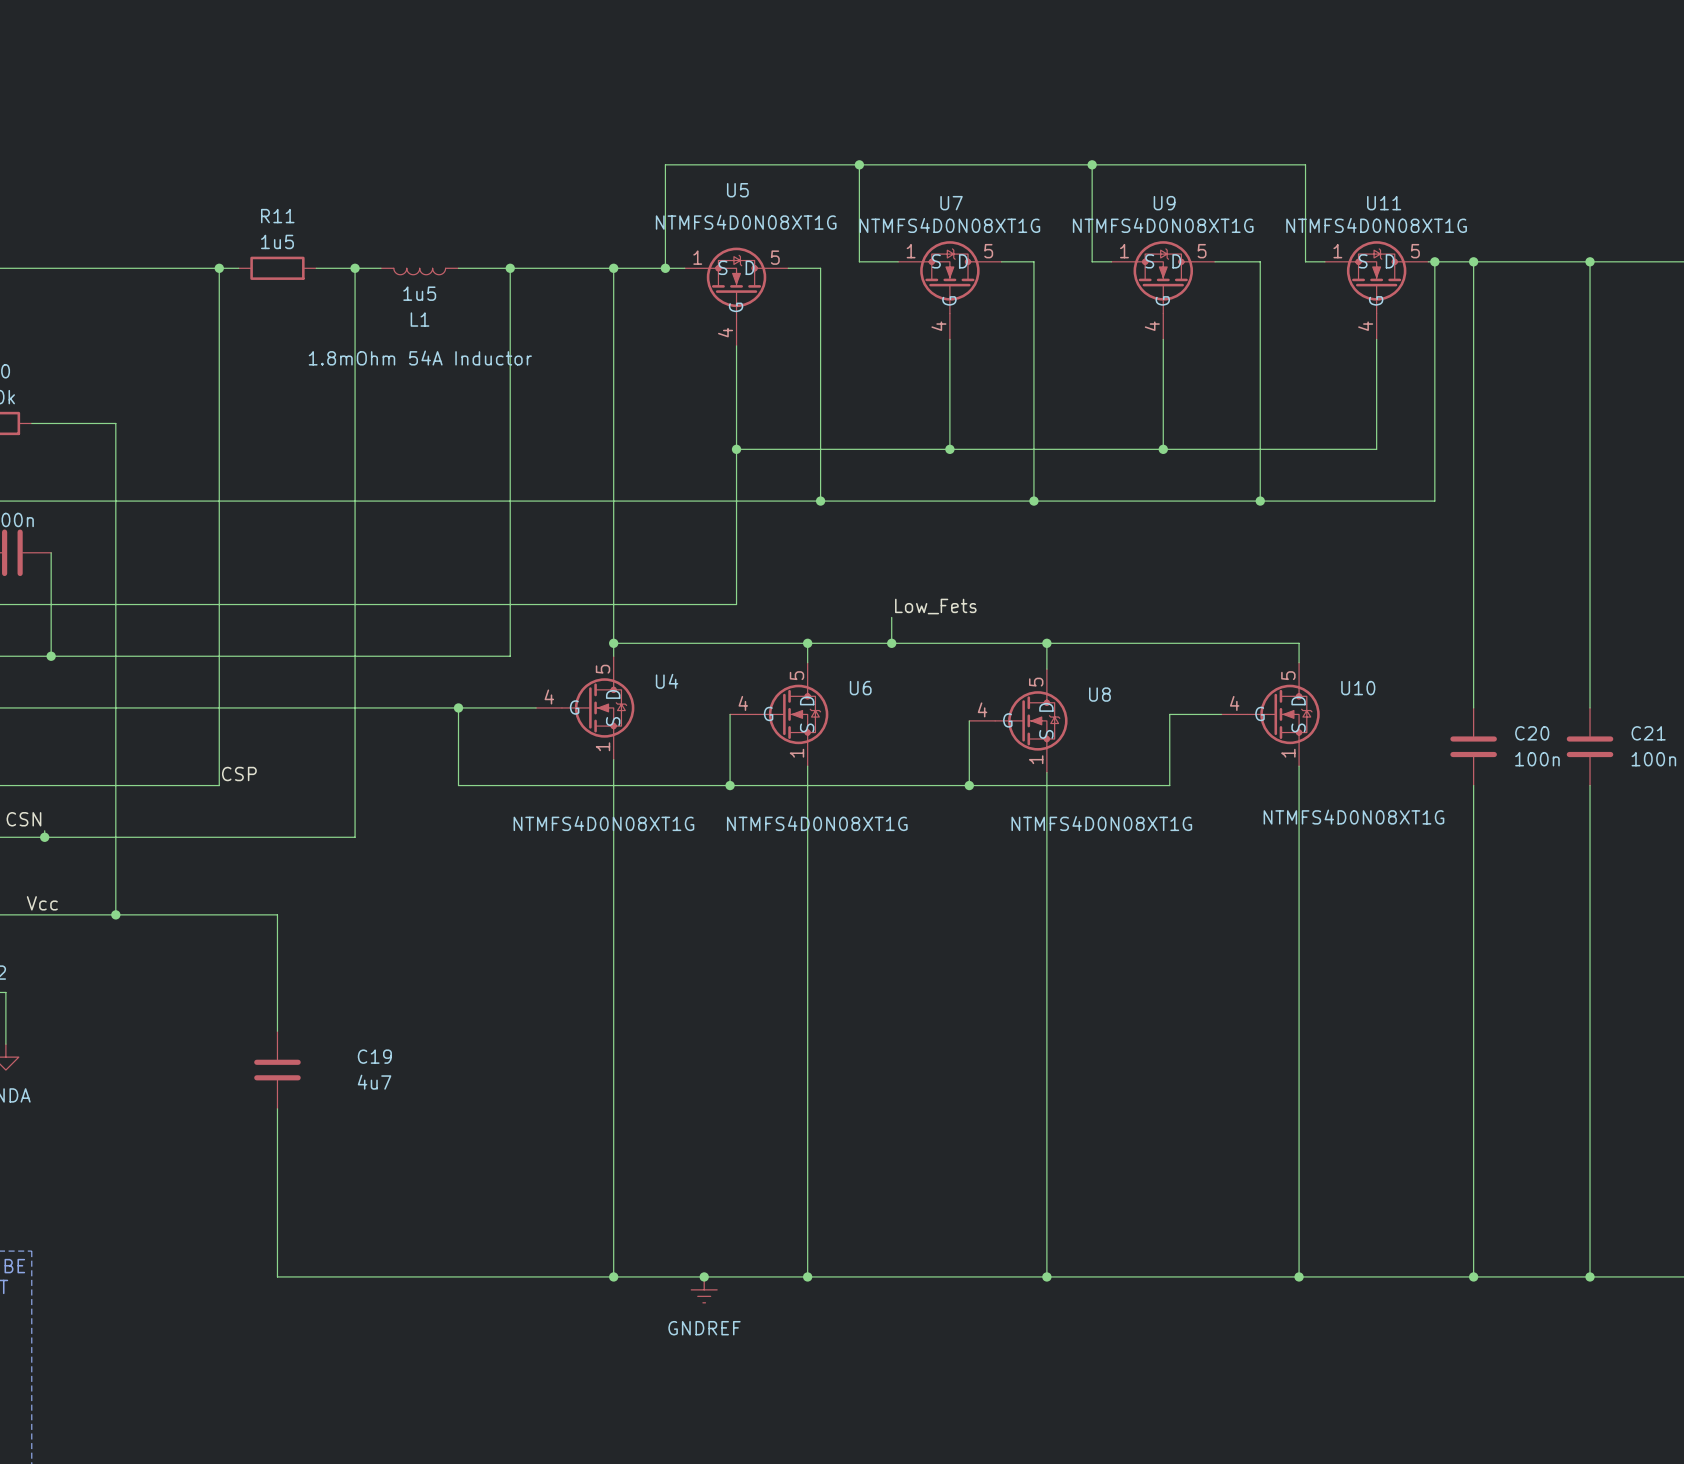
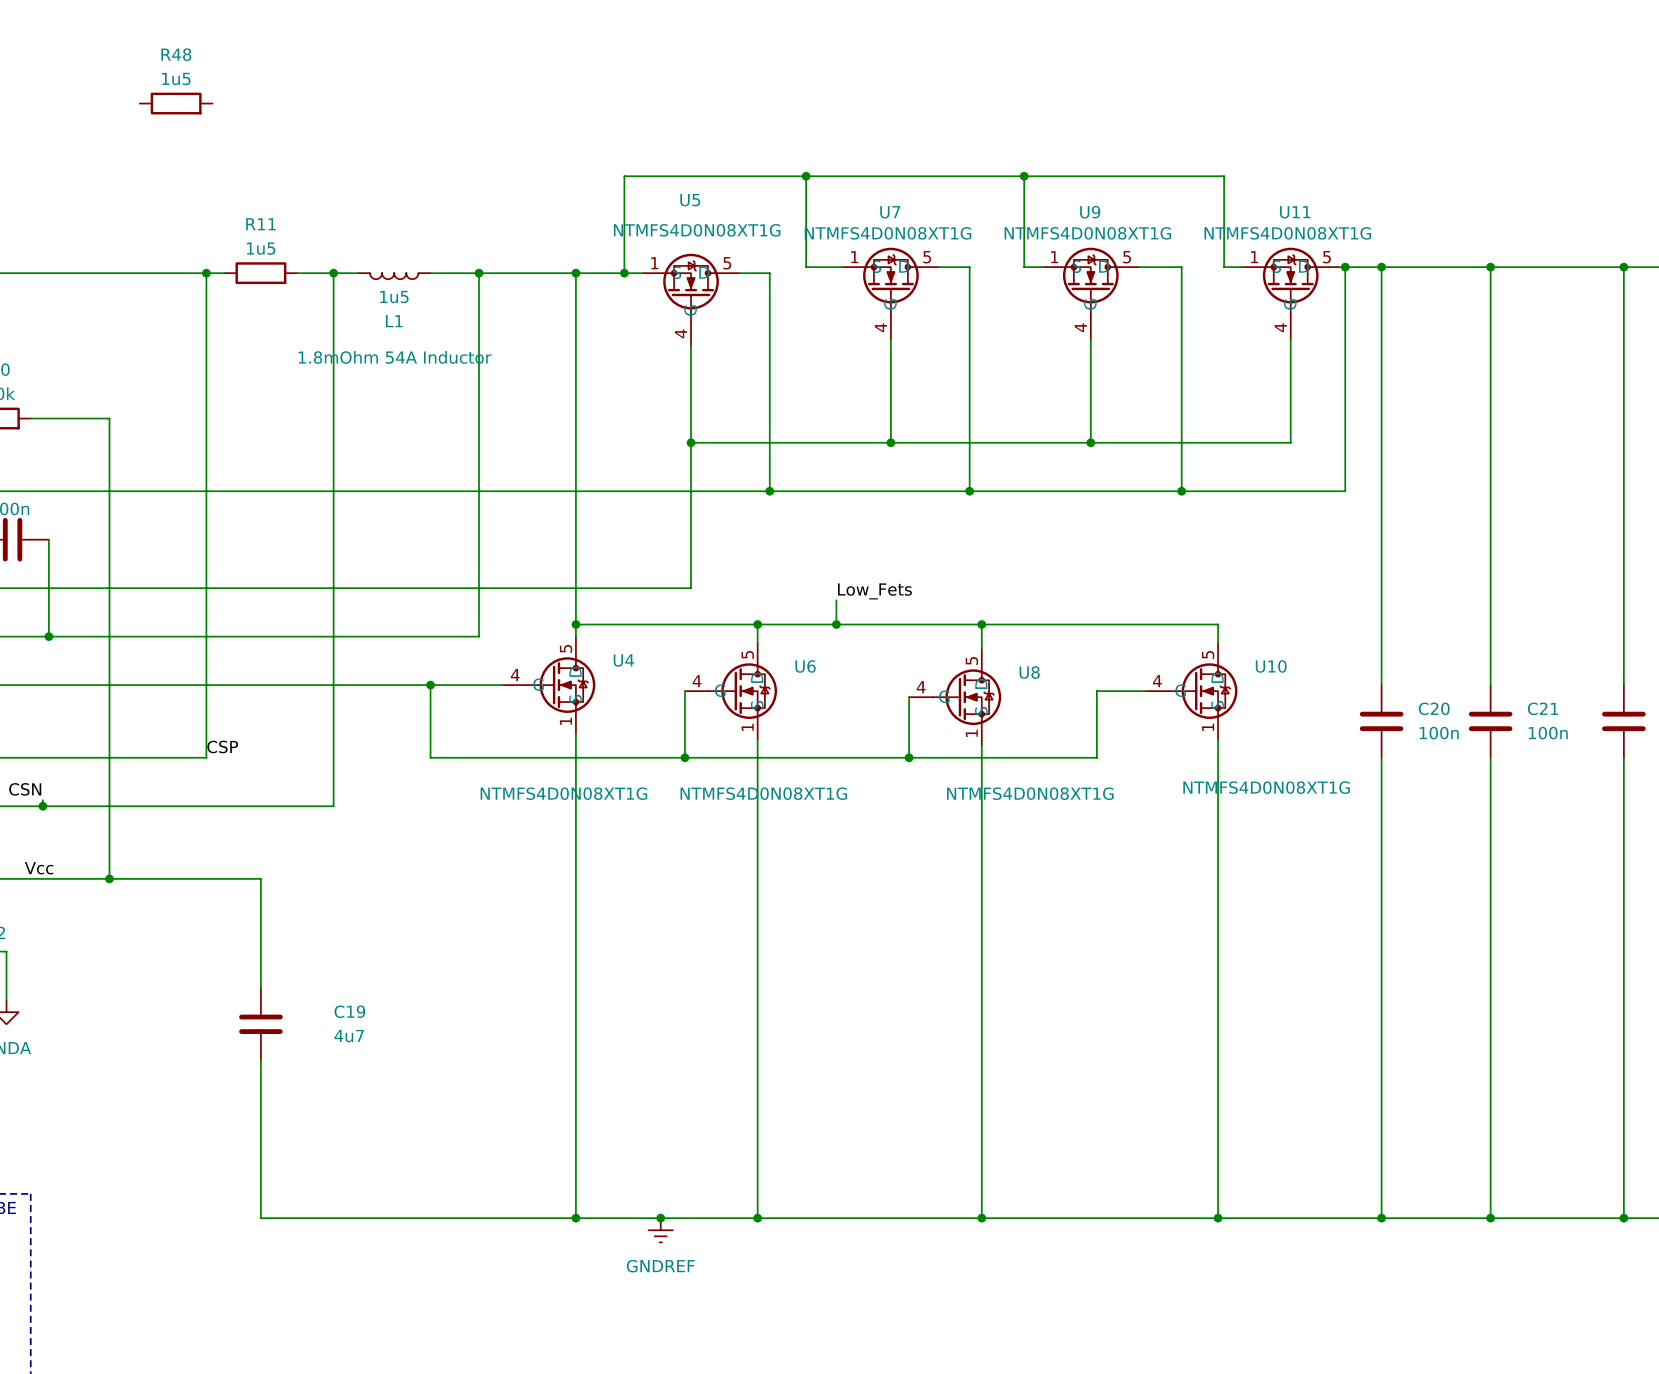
R48: none -> 1u5 (176, 103)

